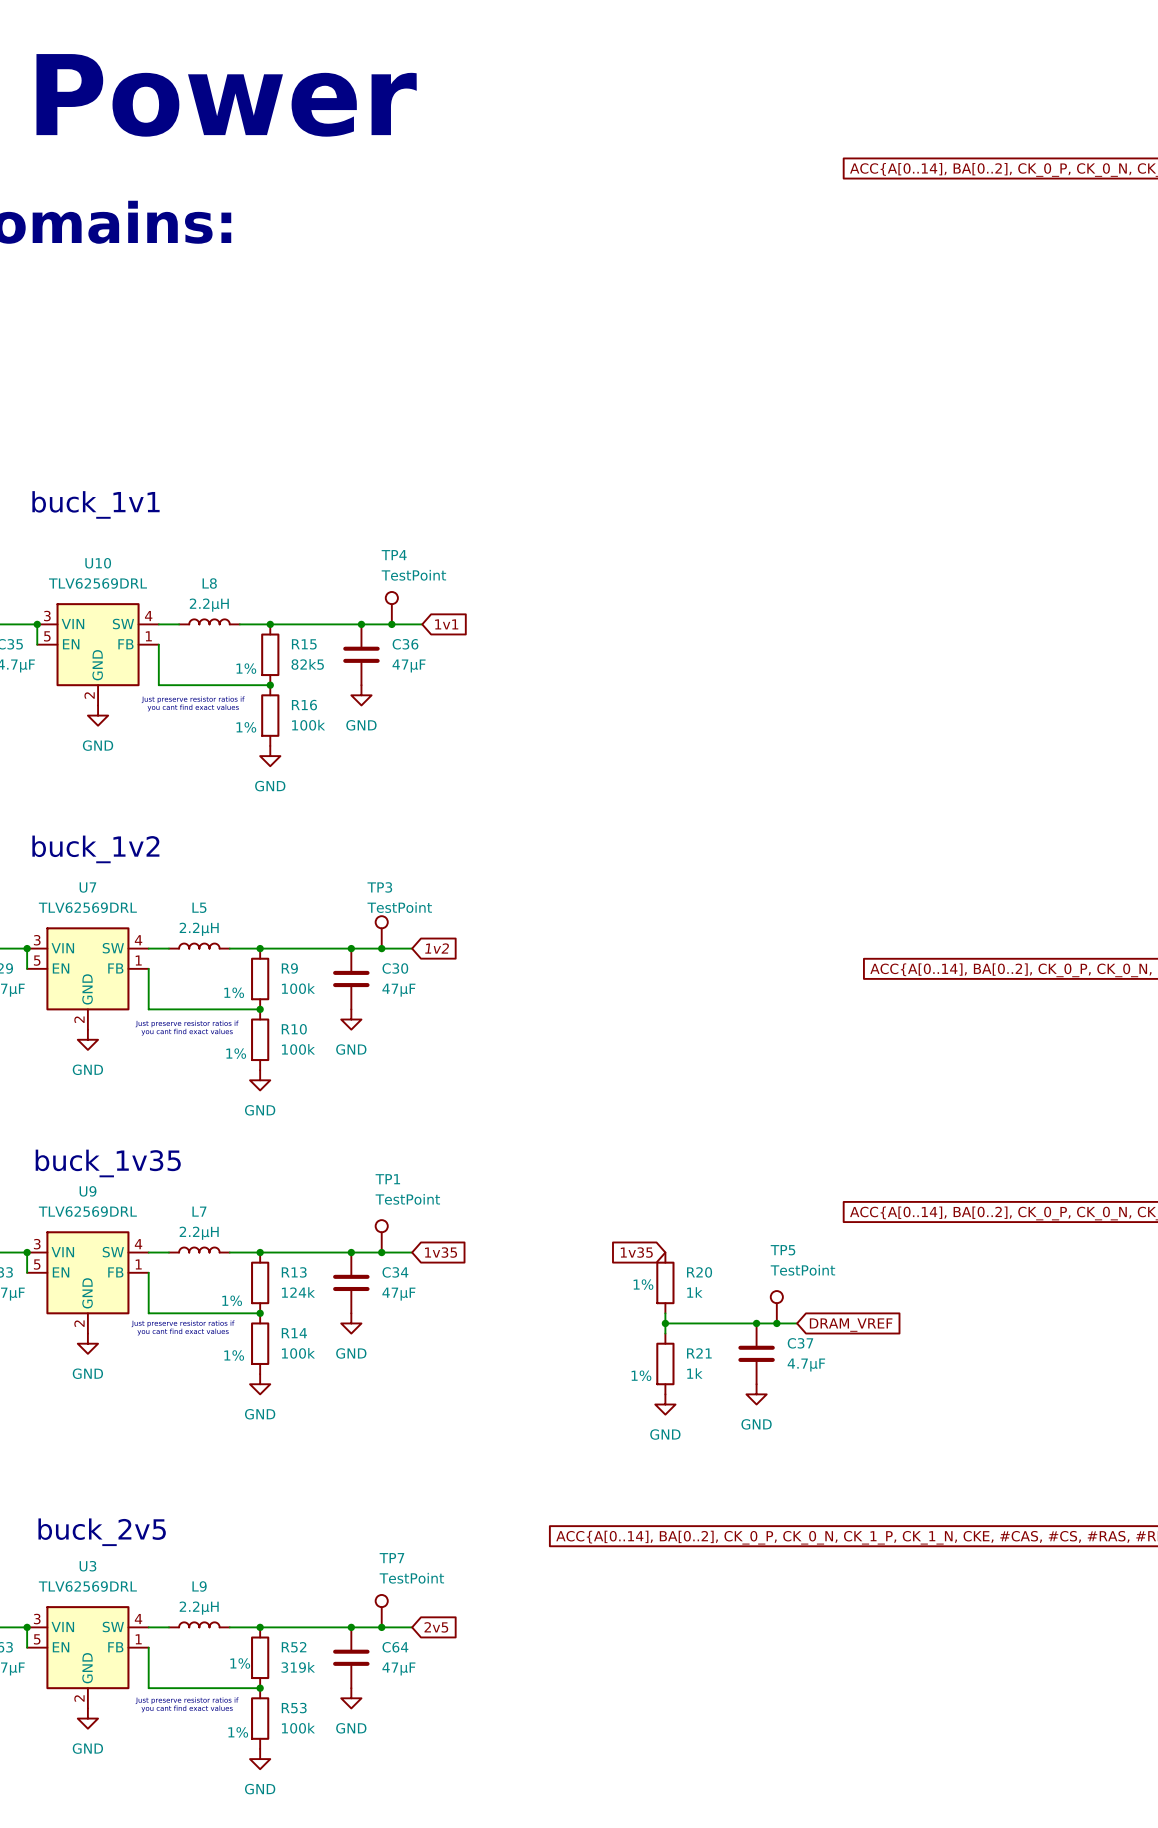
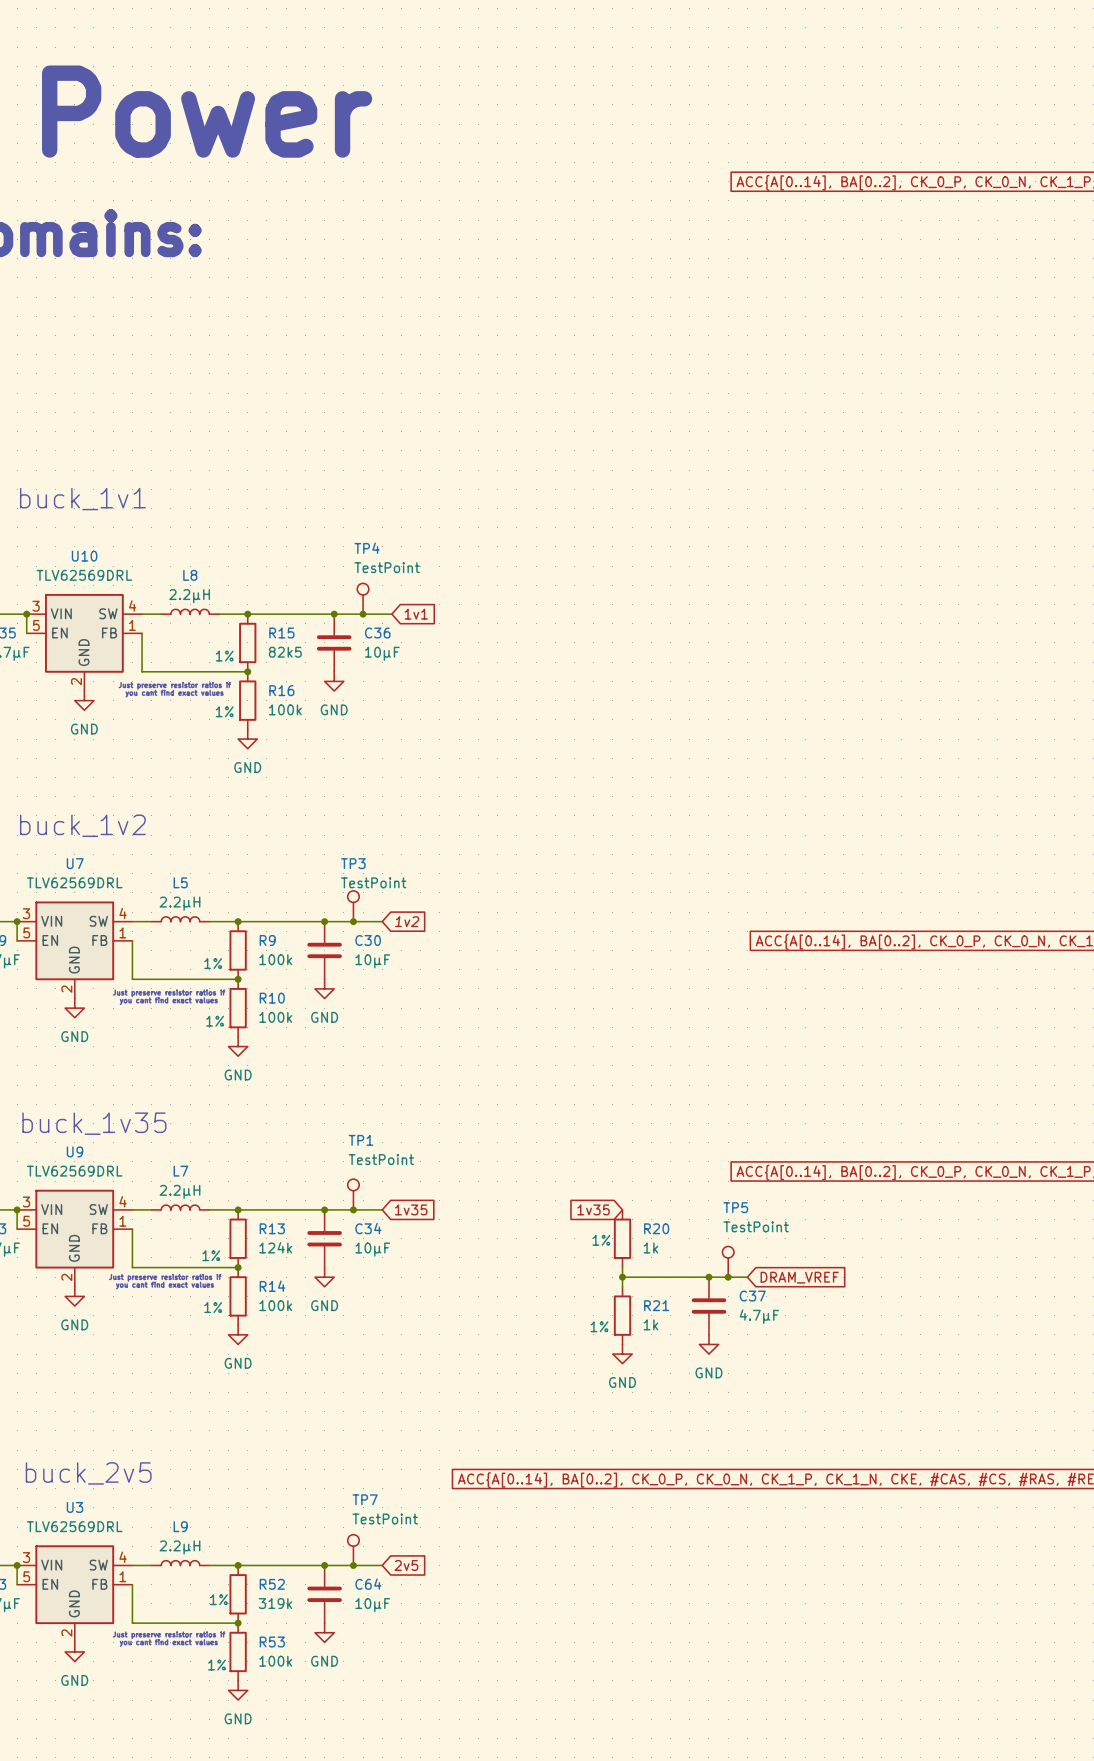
C36 value: 47µF (409, 665) -> 10µF (382, 653)
C30 value: 47µF (398, 990) -> 10µF (372, 961)
C34 value: 47µF (398, 1294) -> 10µF (372, 1249)
C64 value: 47µF (398, 1668) -> 10µF (372, 1605)

